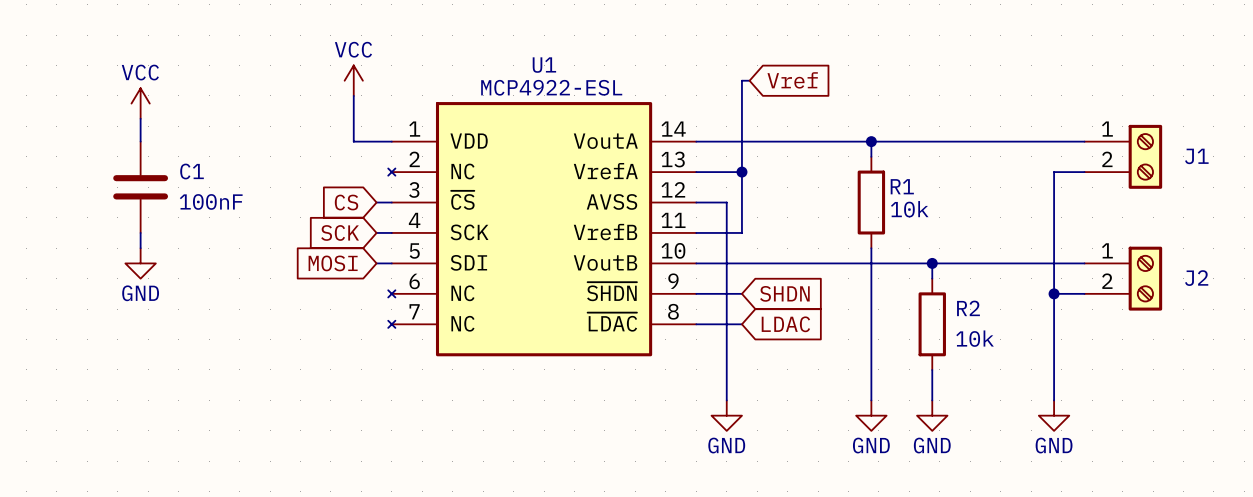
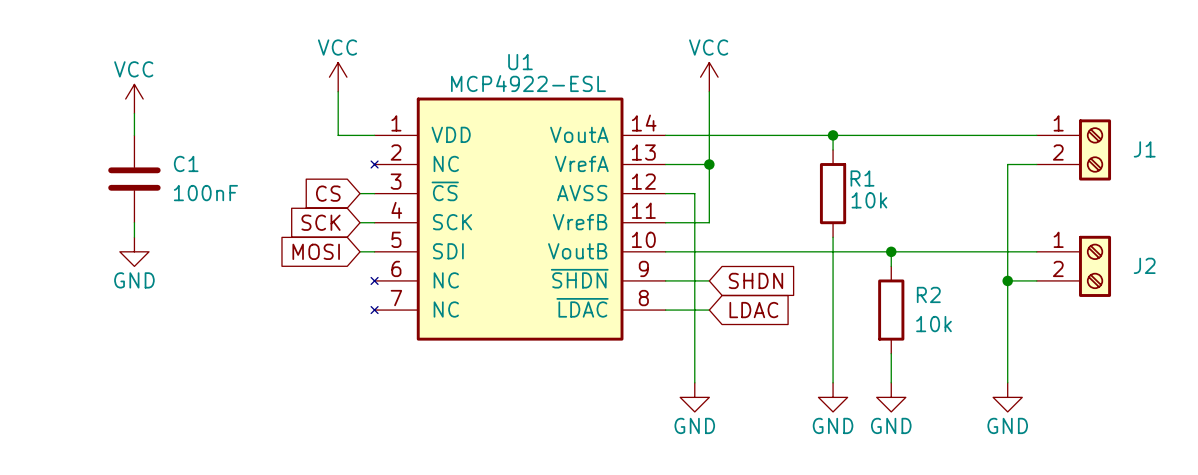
power symbol: none -> VCC (709, 77)
global label: Vref (792, 80) -> none

